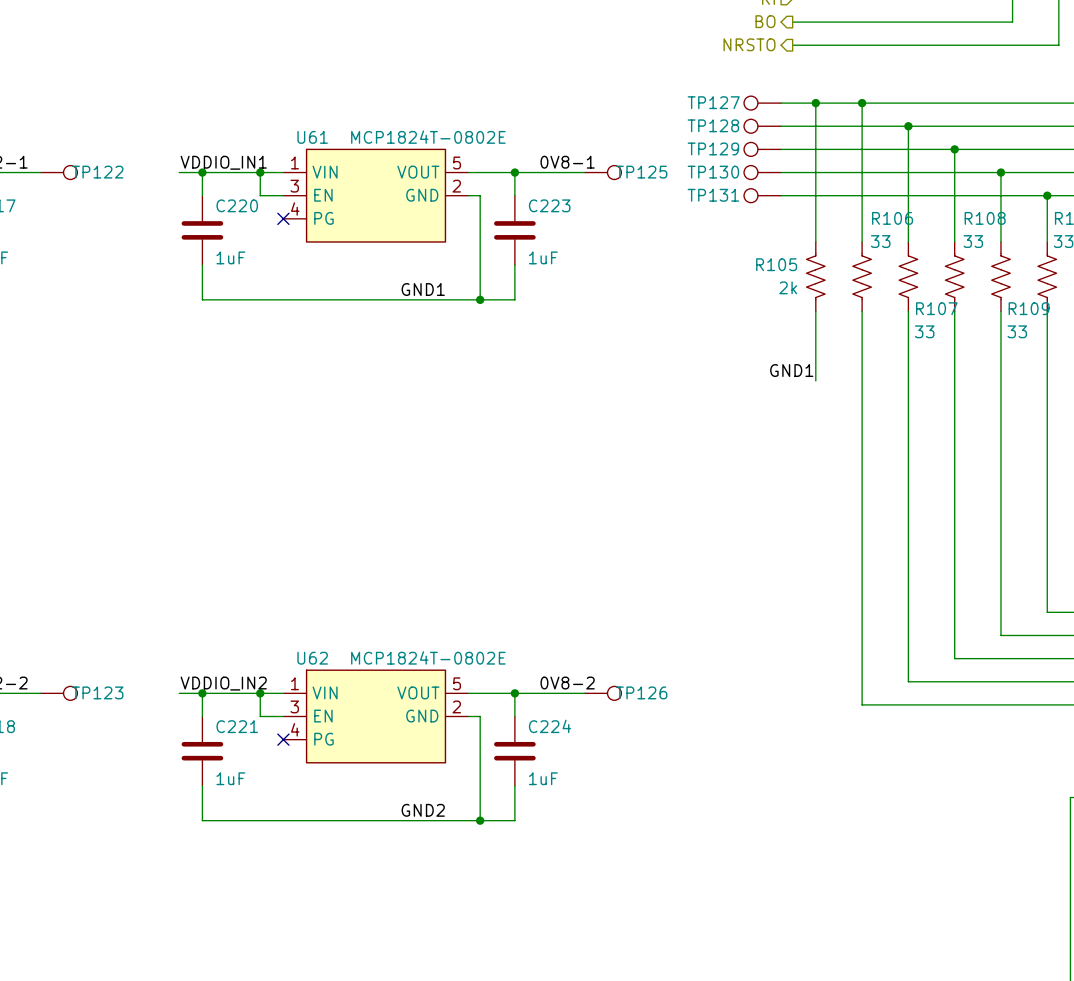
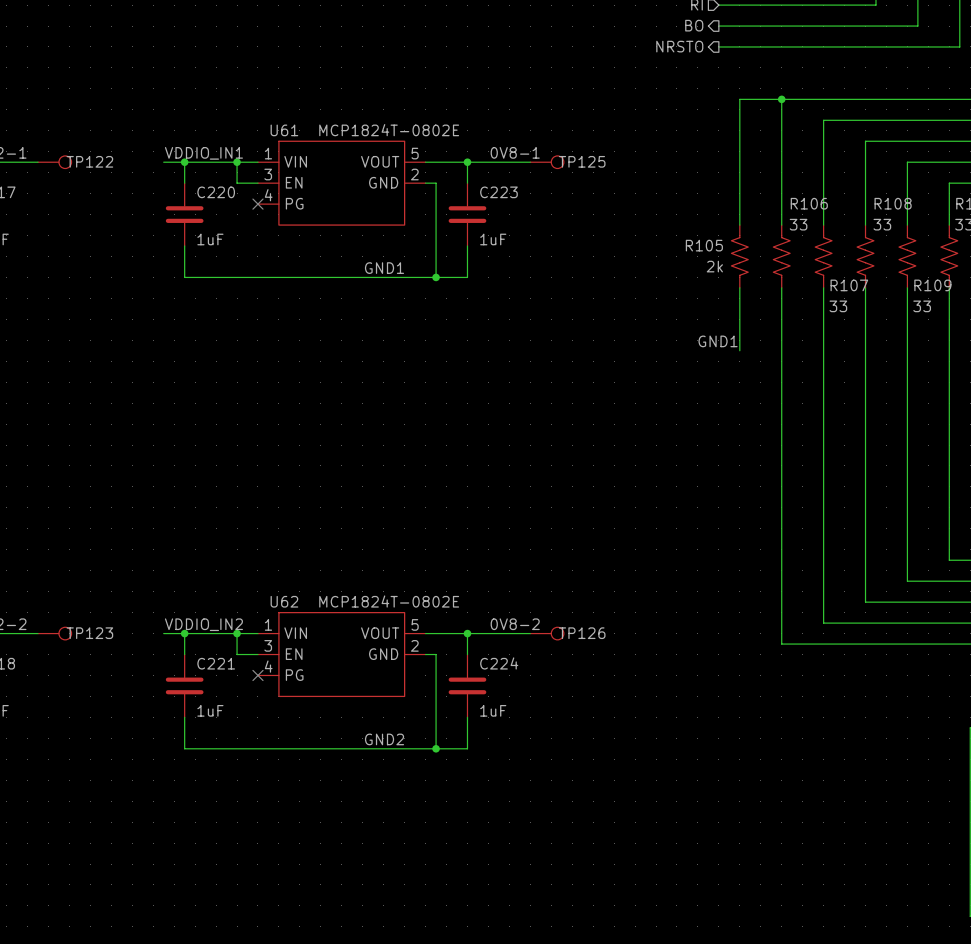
TP127: (762, 103) -> none
wire: (781, 103) (815, 103) -> none
junction: (815, 103) -> none
TP128: (762, 126) -> none
wire: (781, 126) (908, 126) -> none
junction: (908, 126) -> none
TP129: (762, 149) -> none
wire: (781, 149) (954, 149) -> none
junction: (954, 149) -> none
TP130: (762, 172) -> none
wire: (781, 172) (1000, 172) -> none
junction: (1000, 172) -> none
TP131: (762, 195) -> none
wire: (781, 195) (1047, 195) -> none
junction: (1047, 195) -> none

